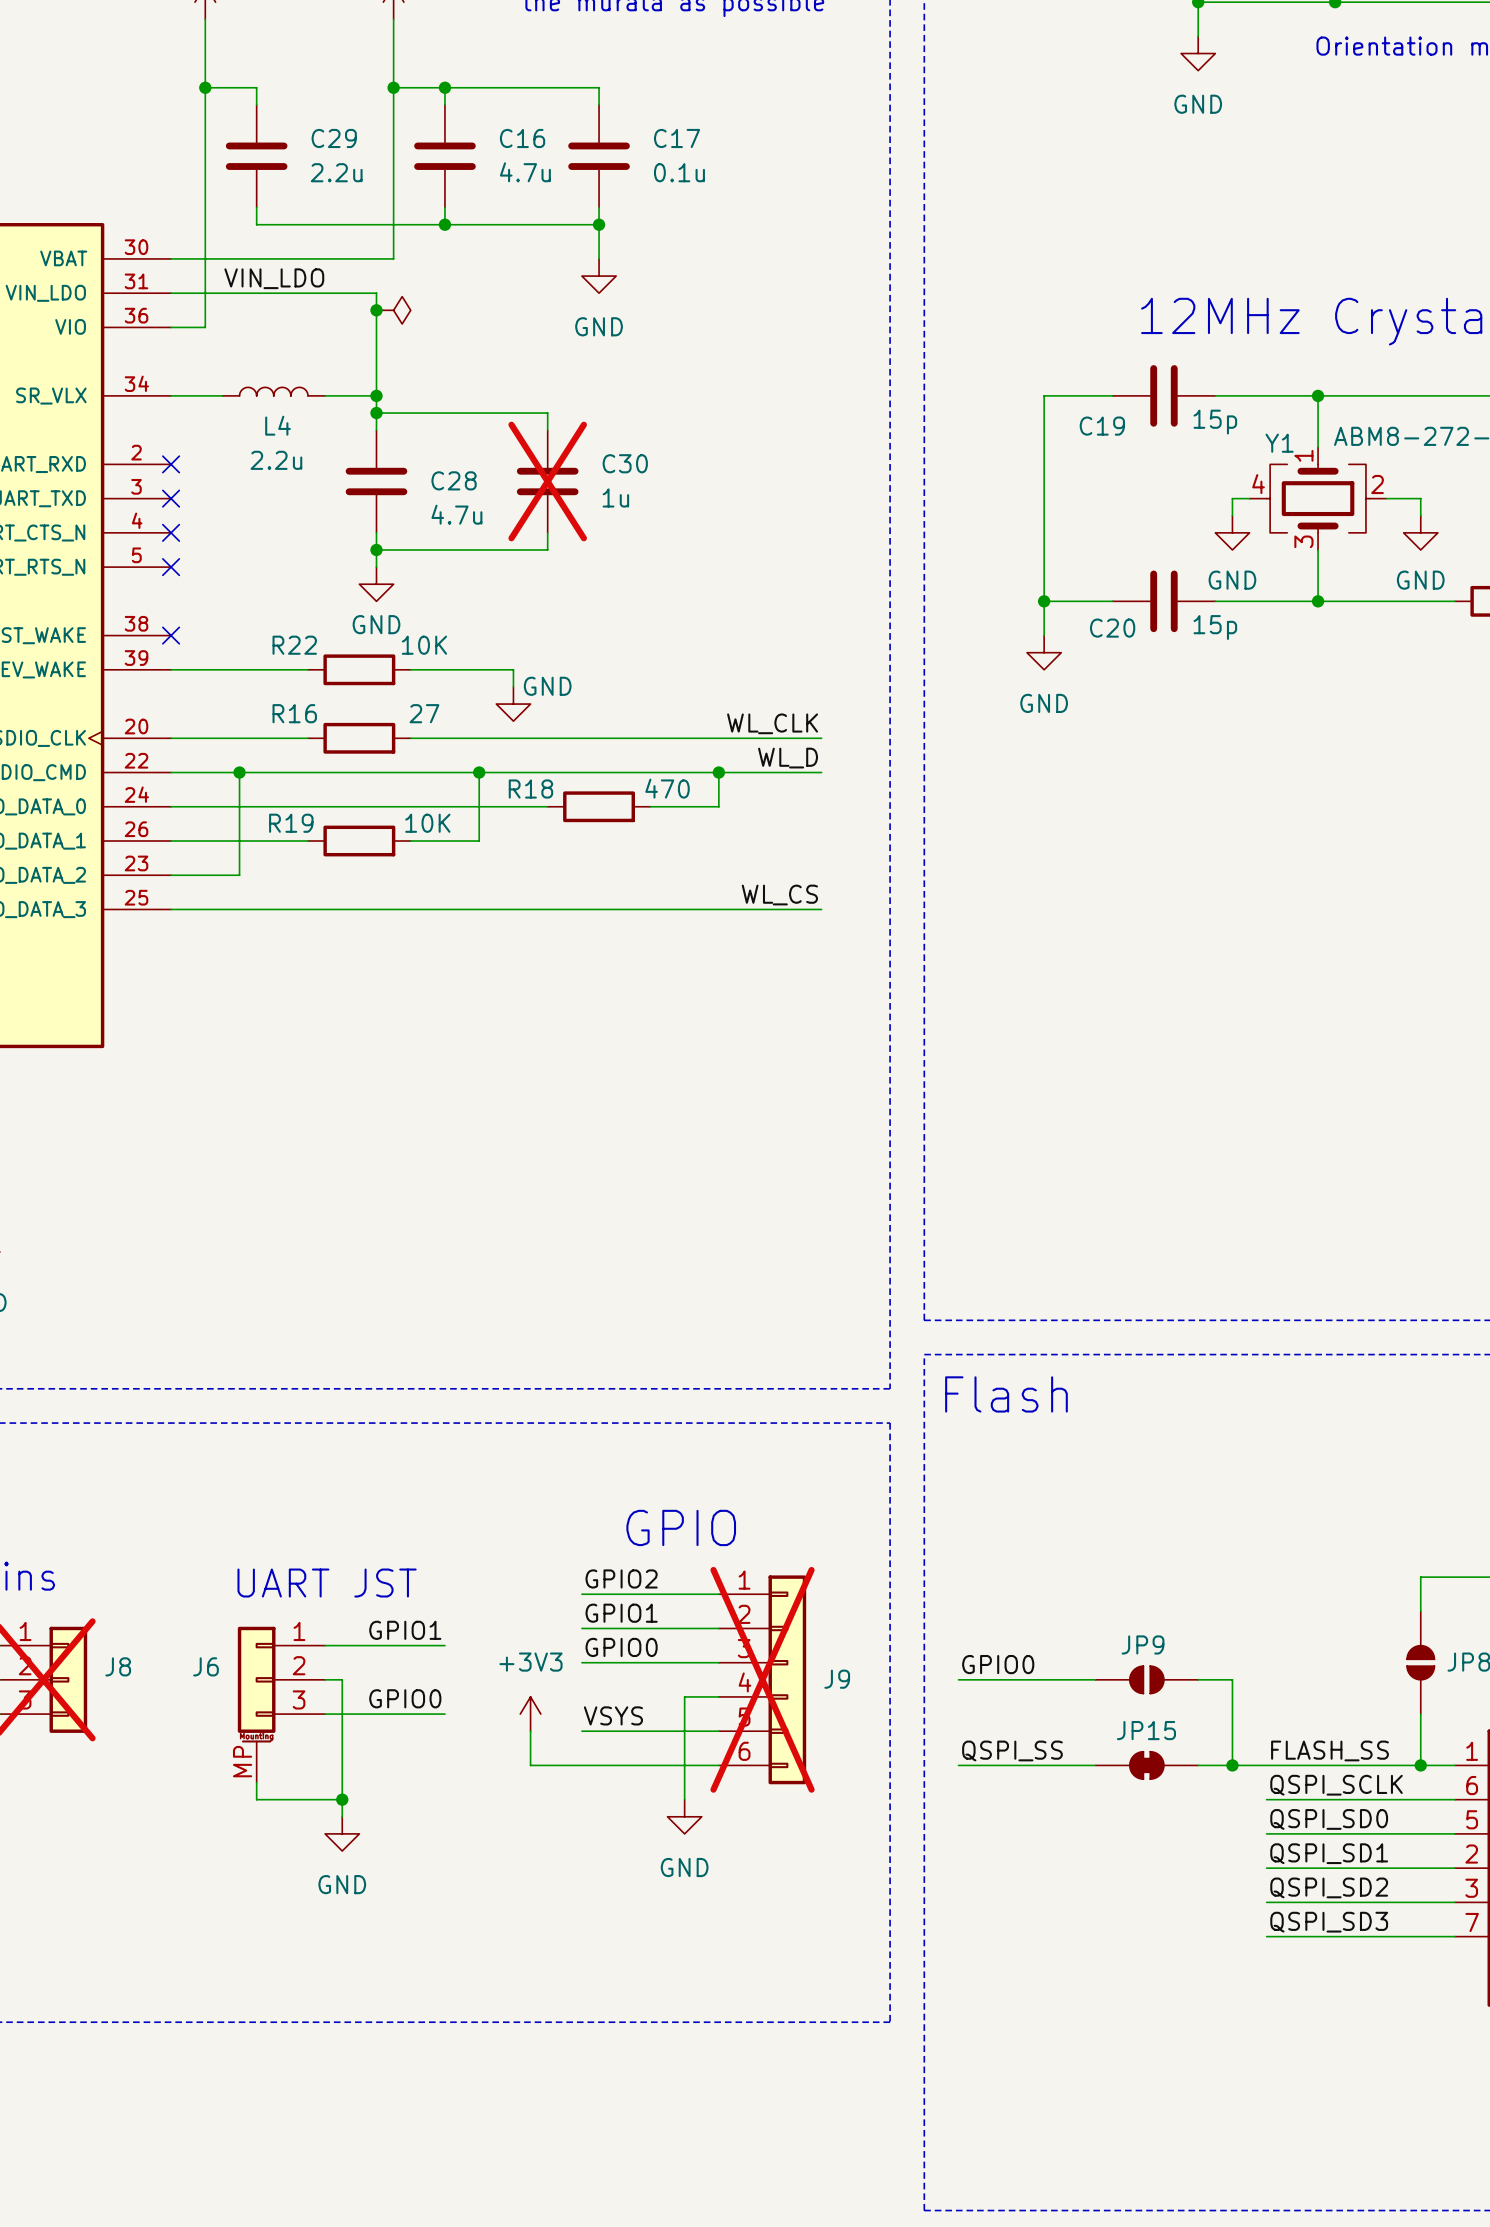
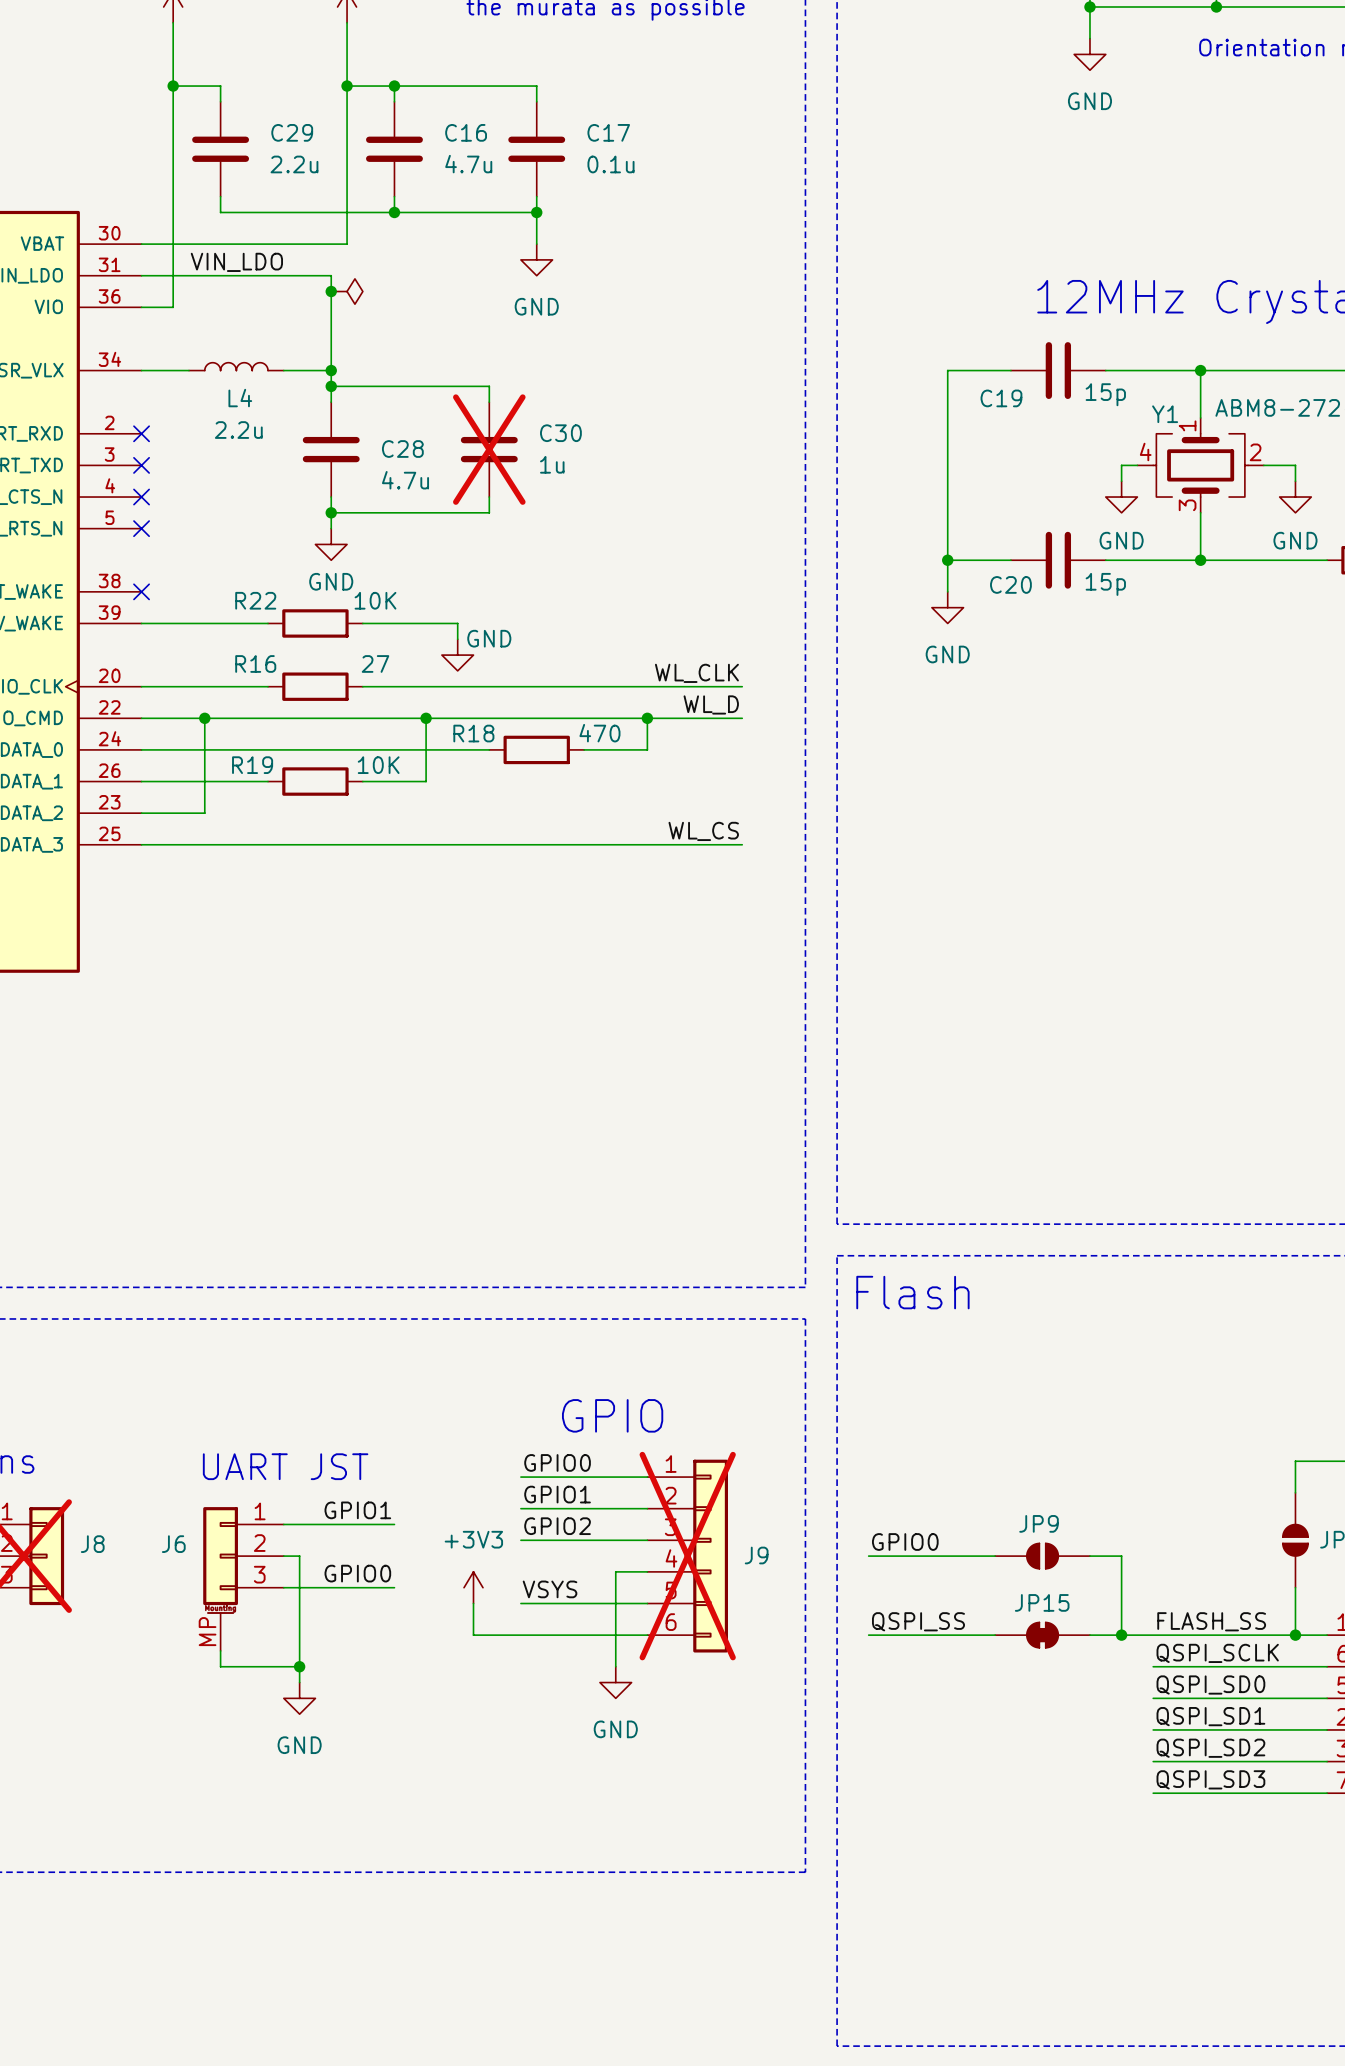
label: GPIO2 (621, 1578) -> GPIO0 (557, 1462)
label: GPIO0 (621, 1647) -> GPIO2 (557, 1526)

